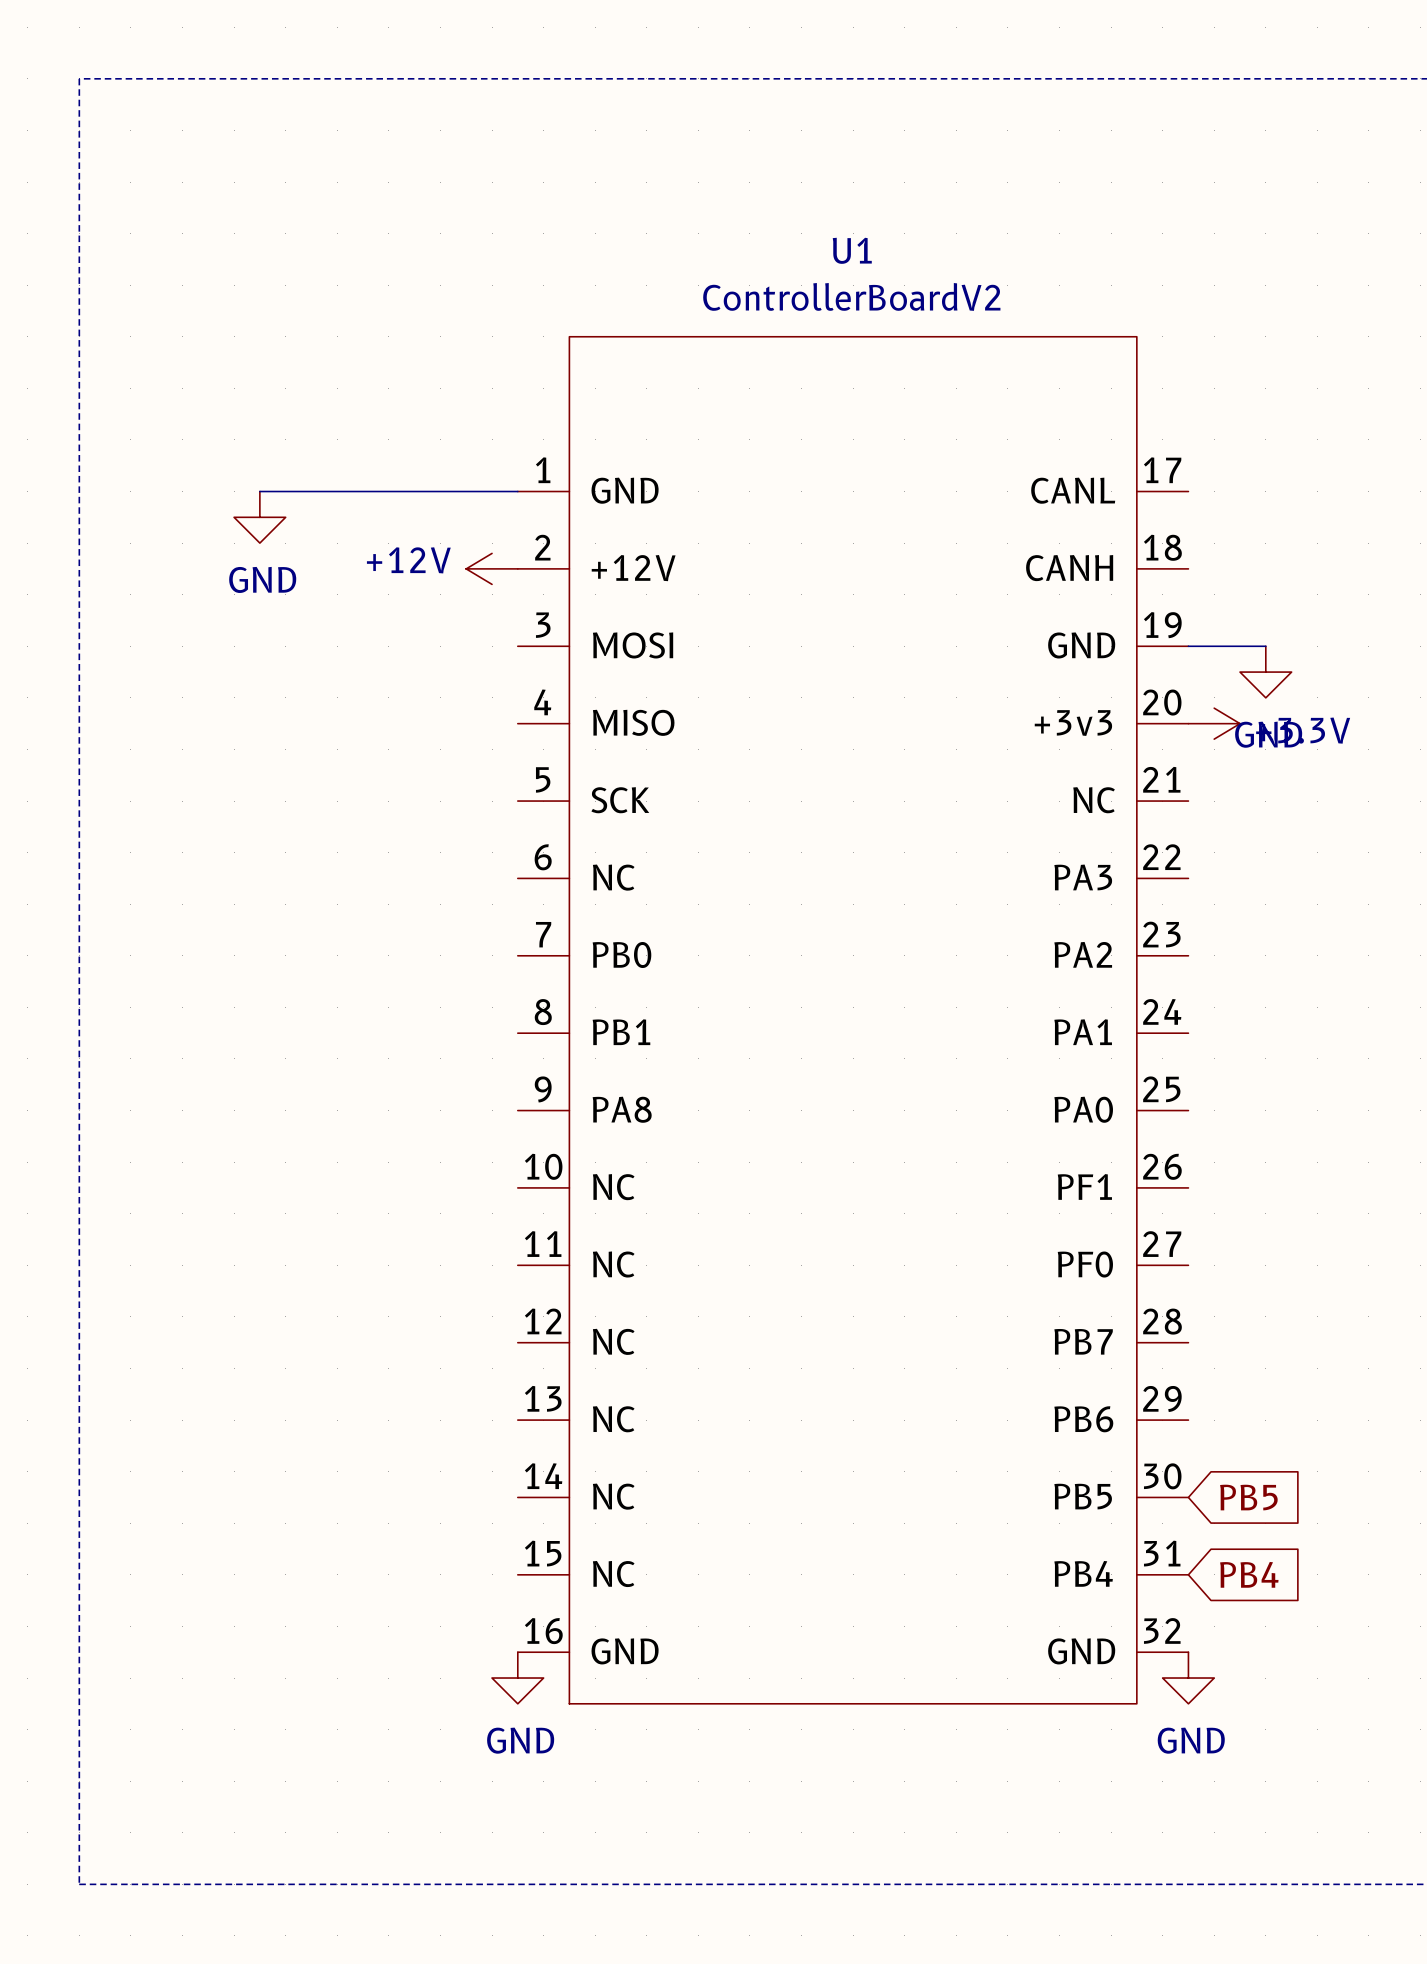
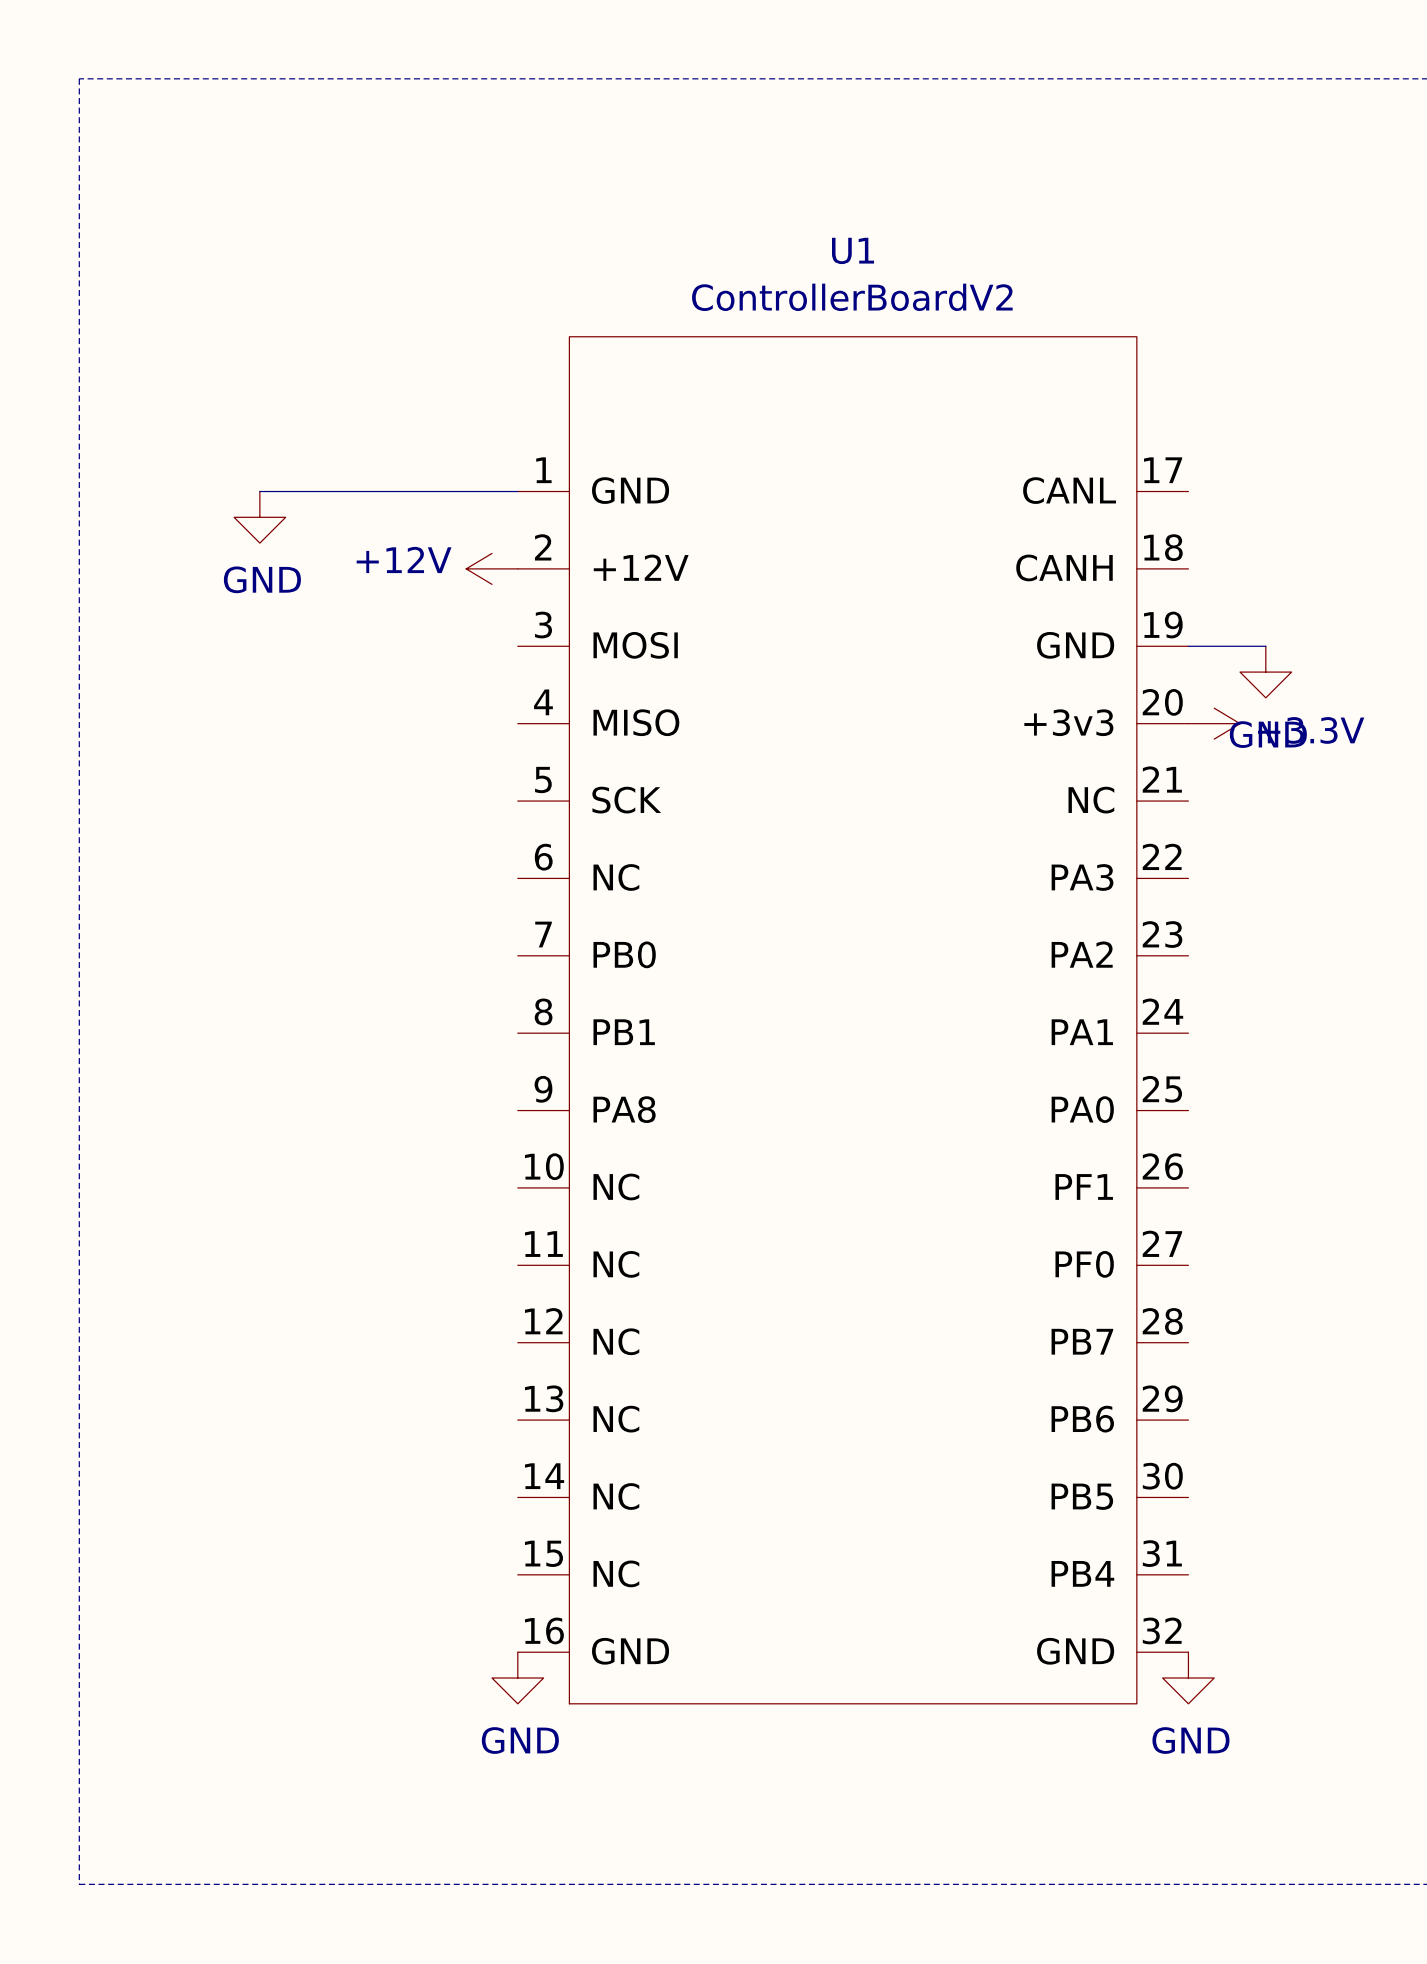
global label: PB5 (1248, 1497) -> none
global label: PB4 (1249, 1574) -> none

